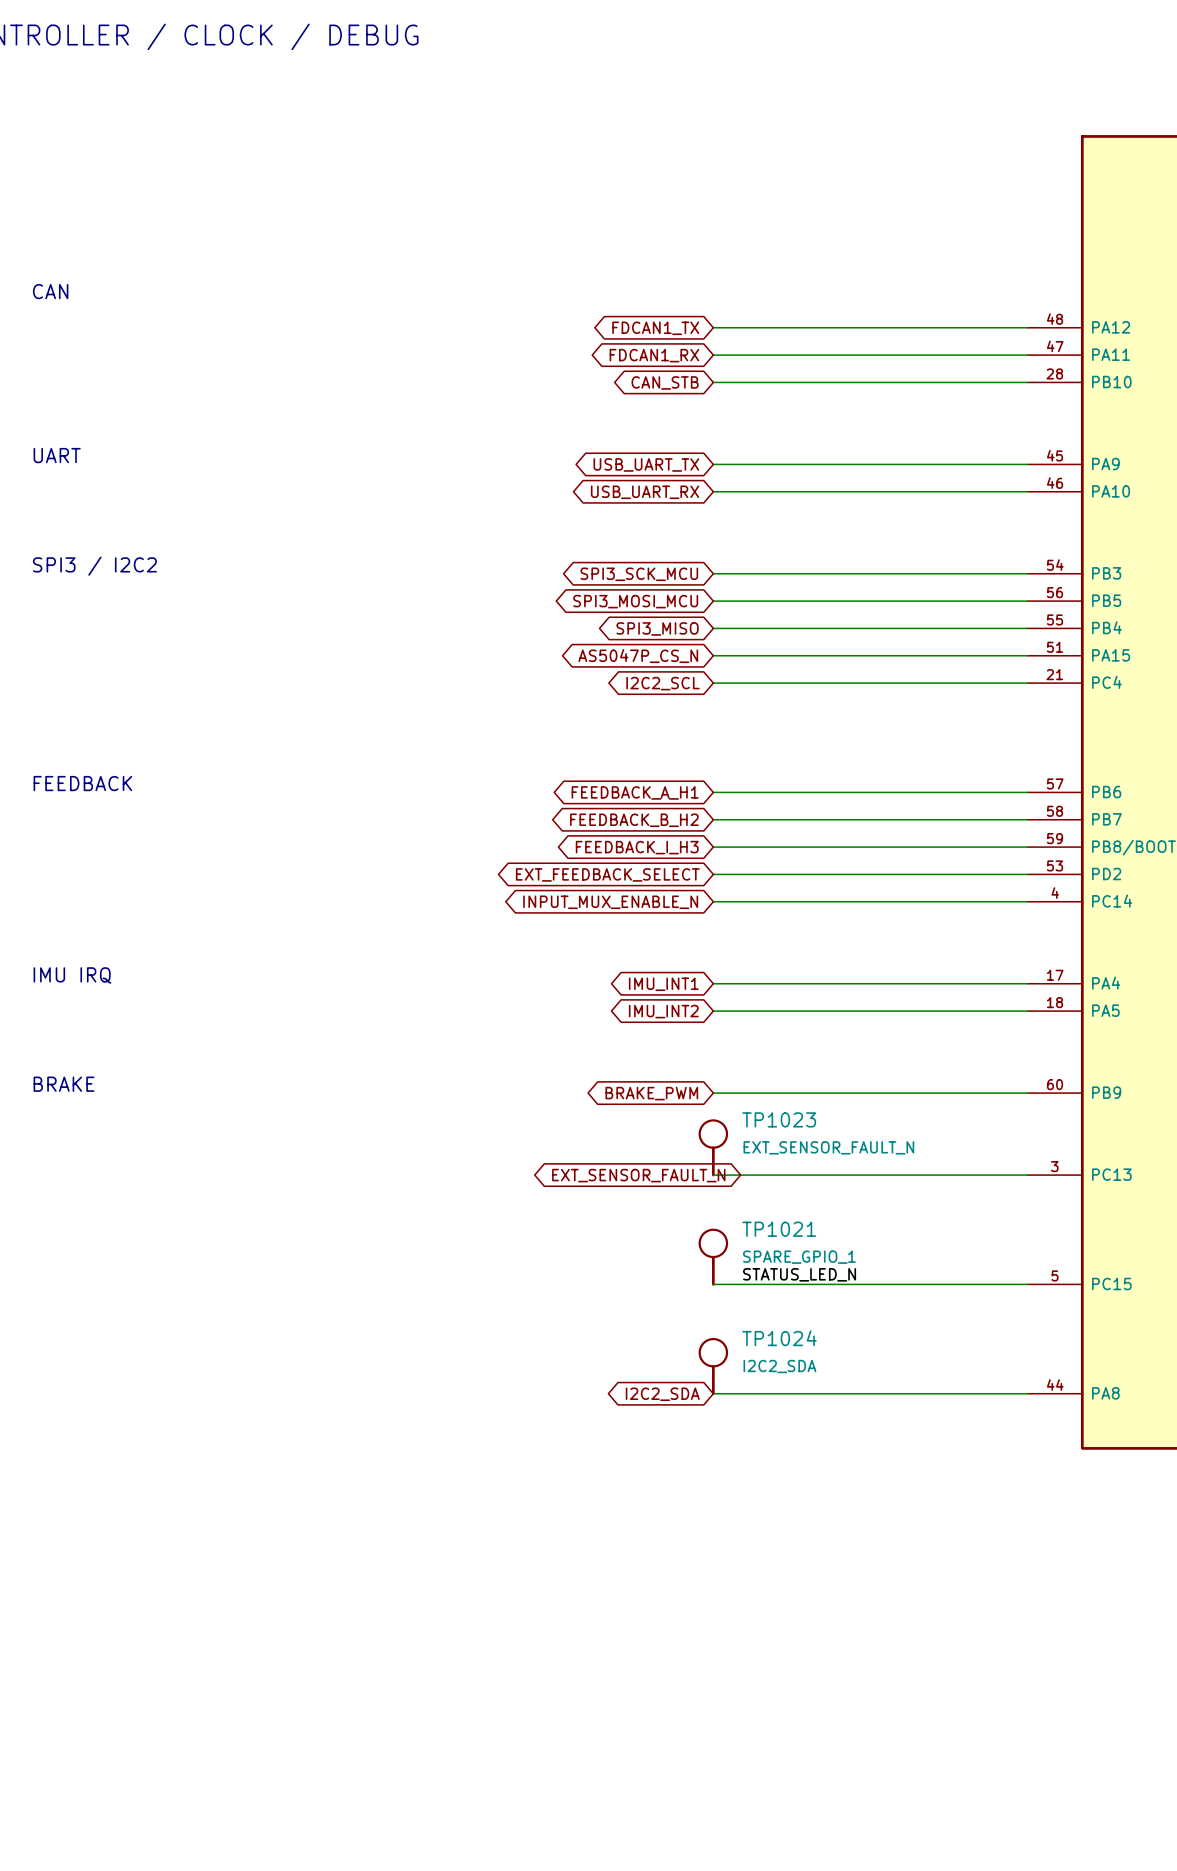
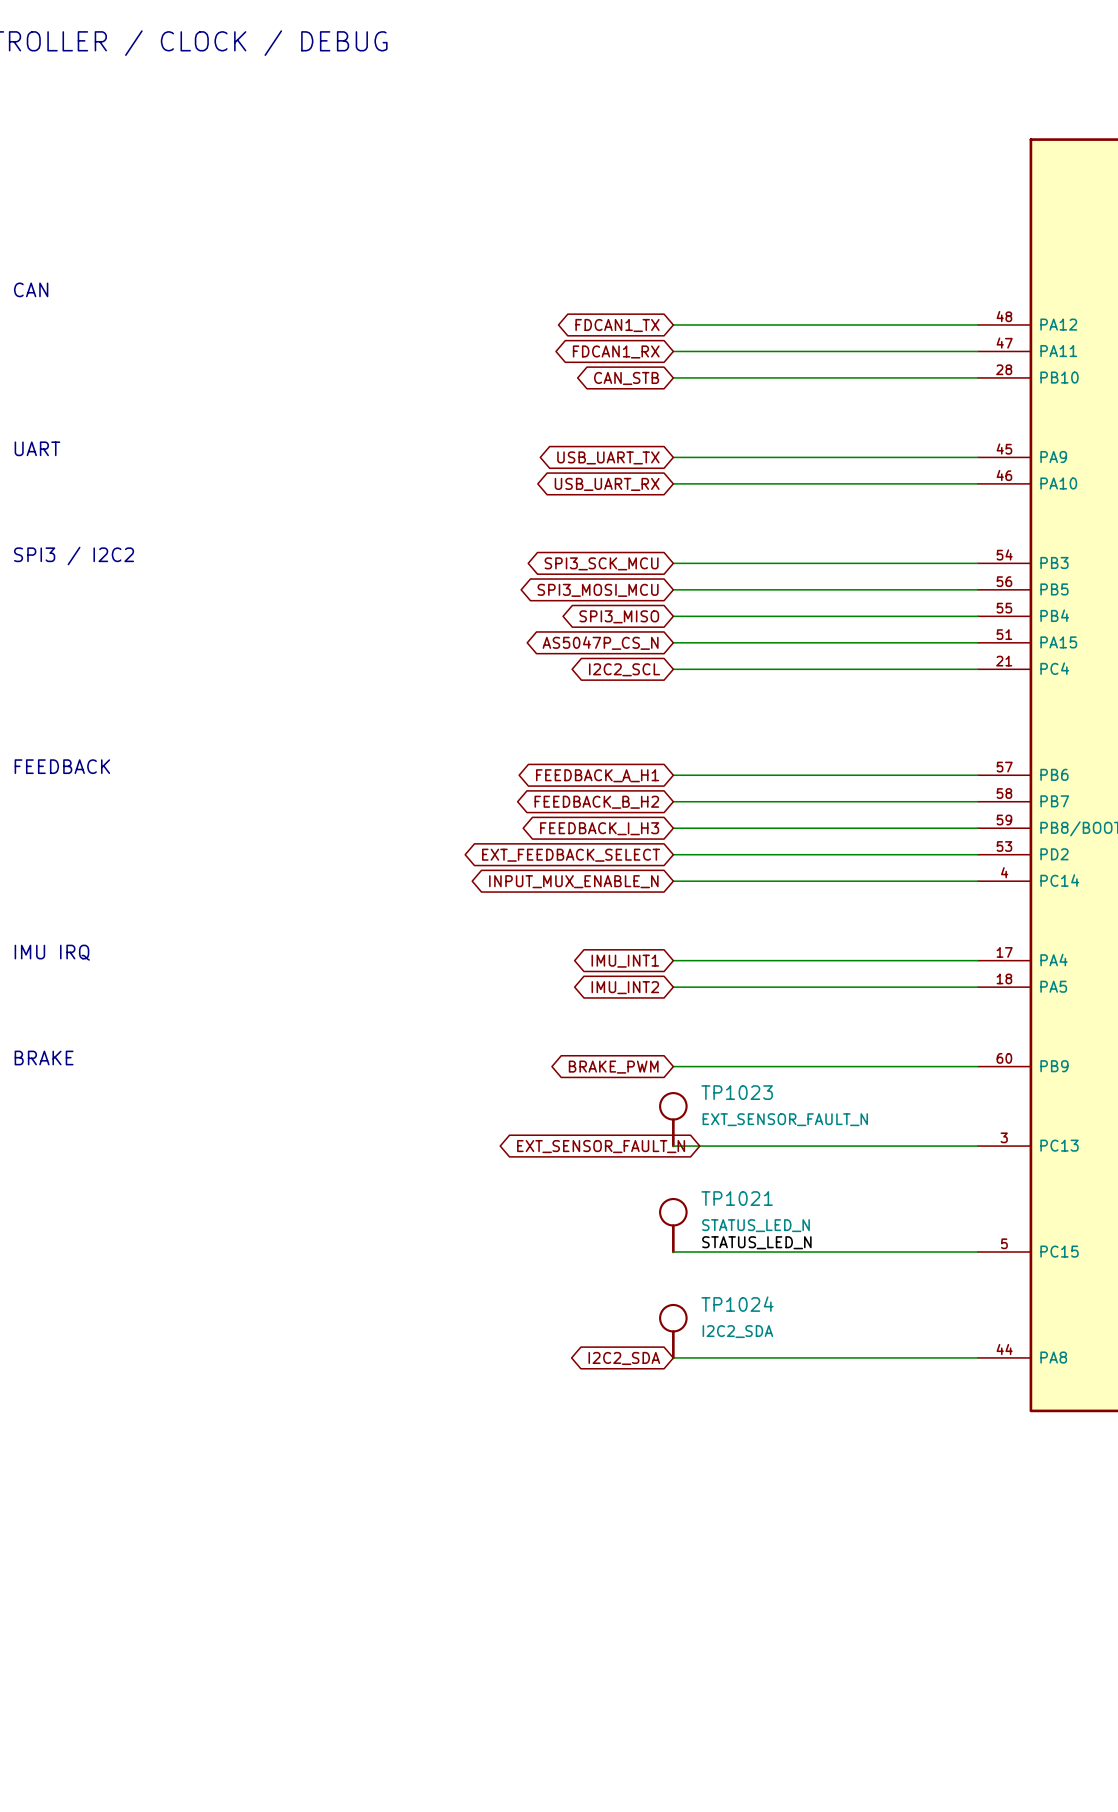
TP1021 value: SPARE_GPIO_1 (799, 1257) -> STATUS_LED_N (755, 1225)

